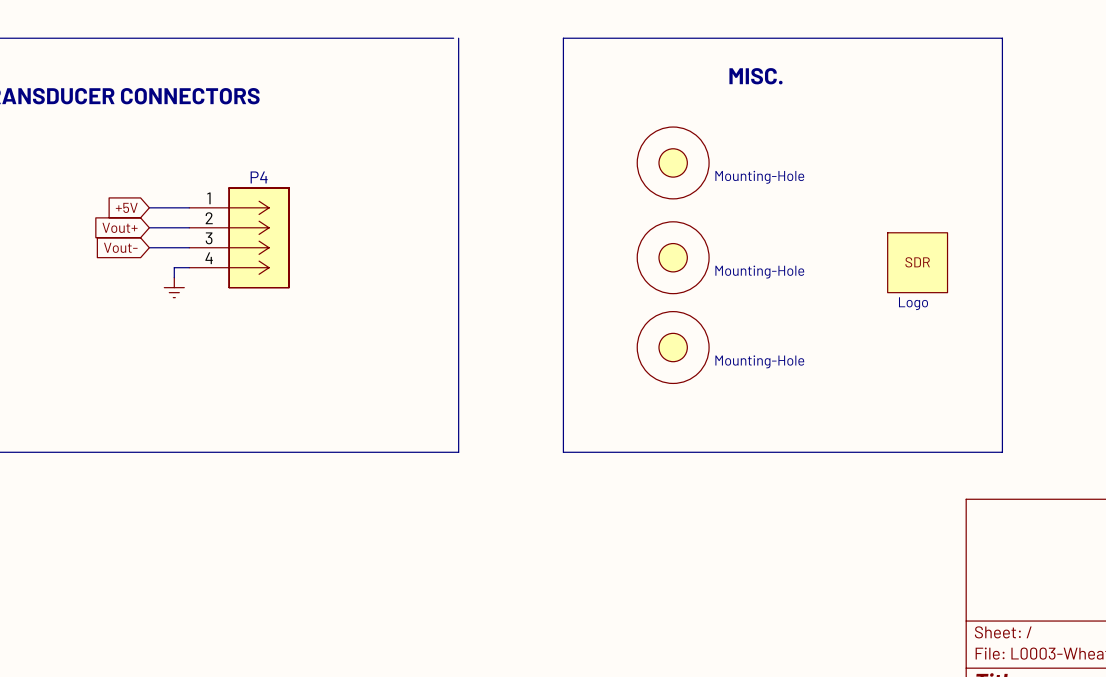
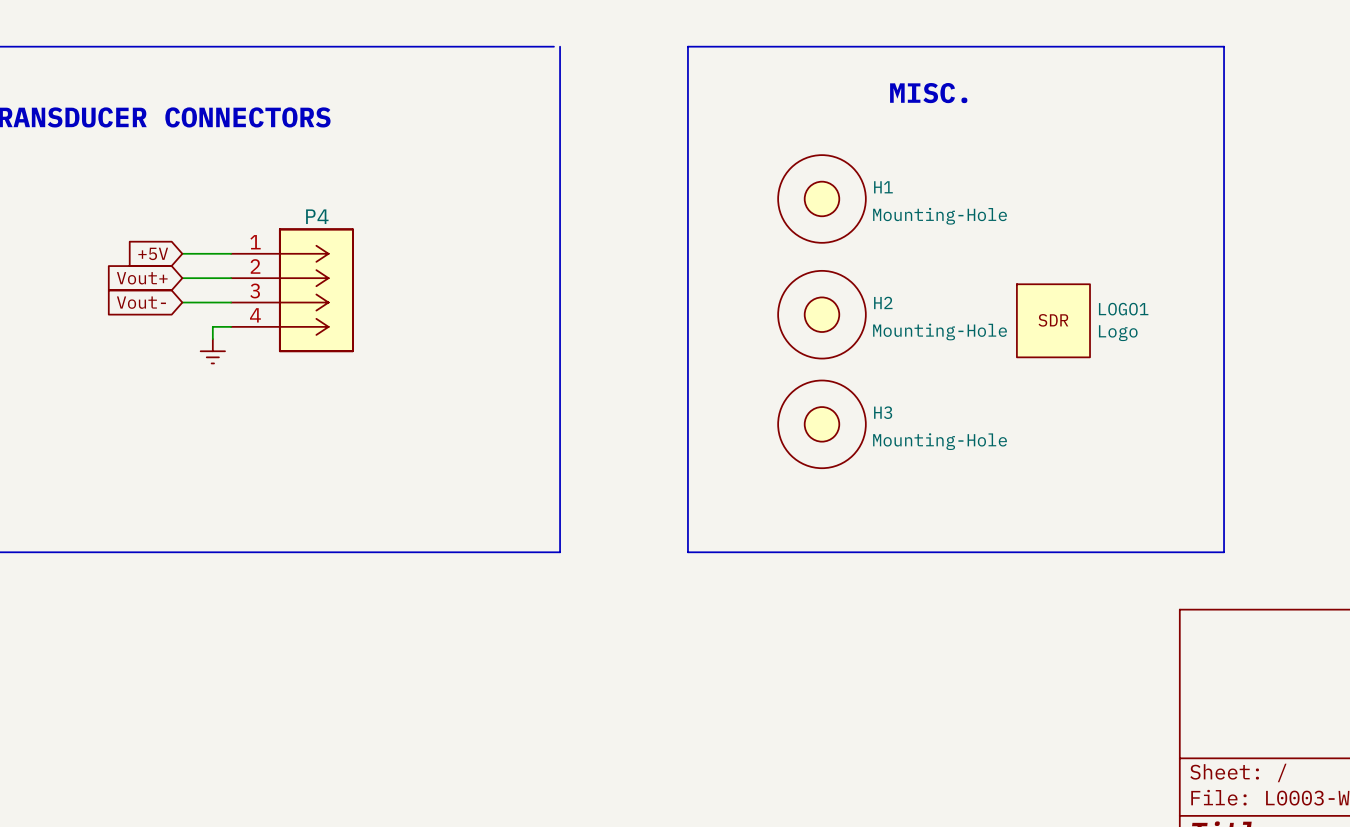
H1 name: none -> H1 (883, 187)
H2 name: none -> H2 (883, 302)
LOGO1: none -> Logo (1053, 320)
part: Logo (917, 262) -> none
H3 name: none -> H3 (883, 412)

